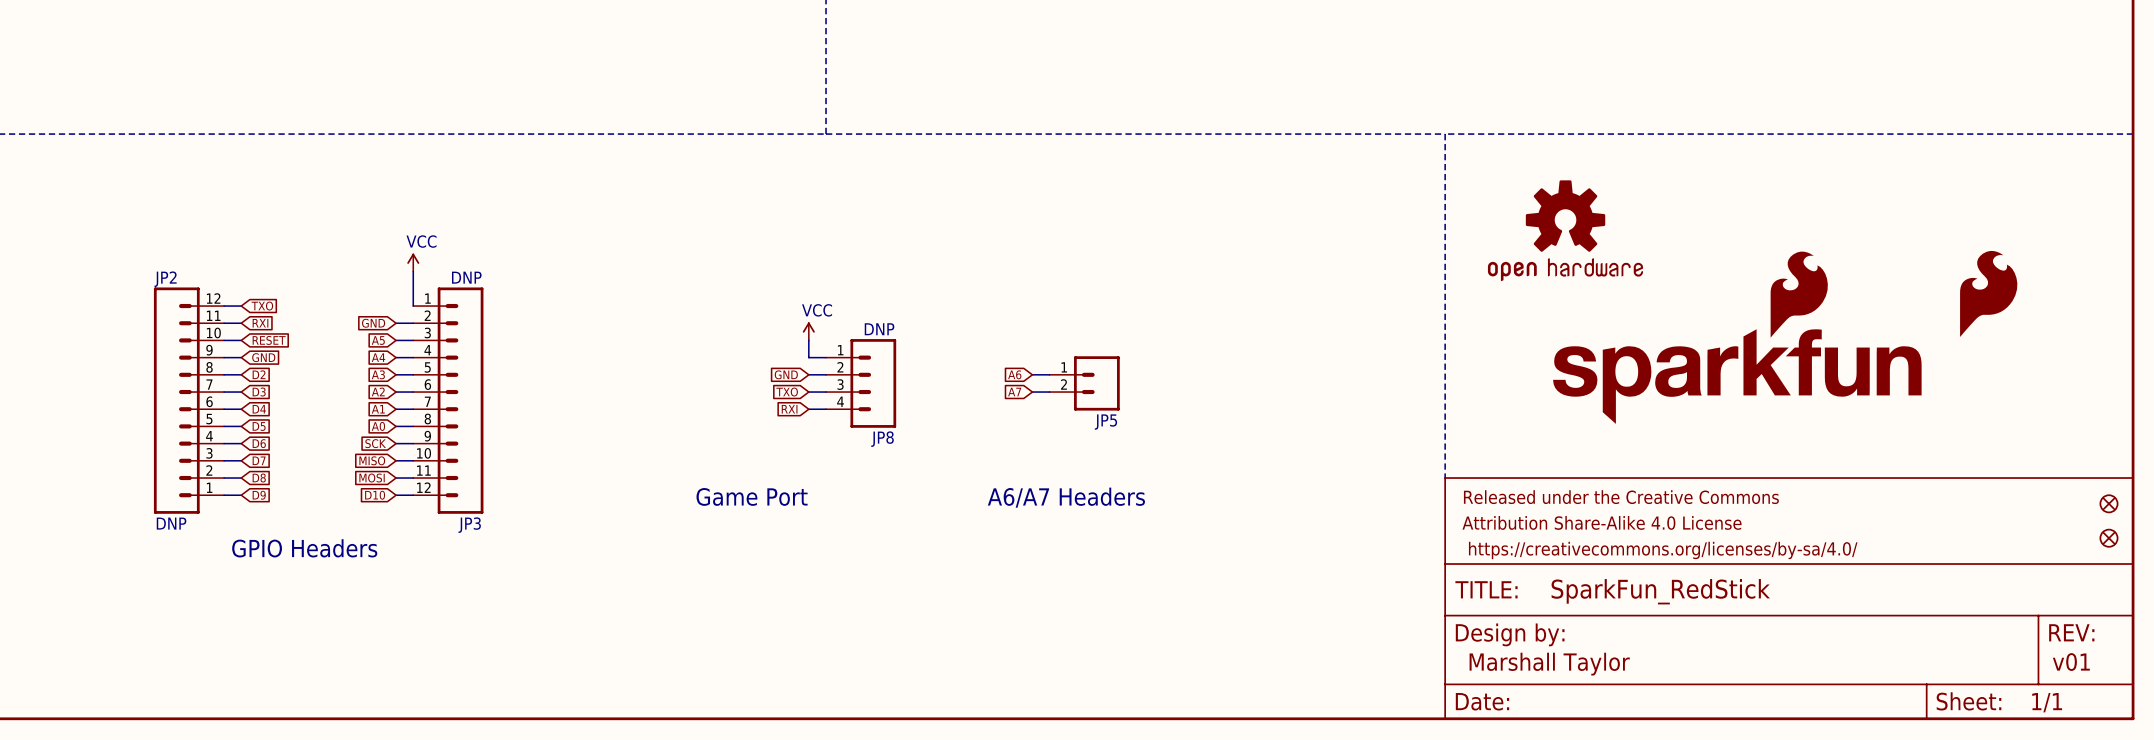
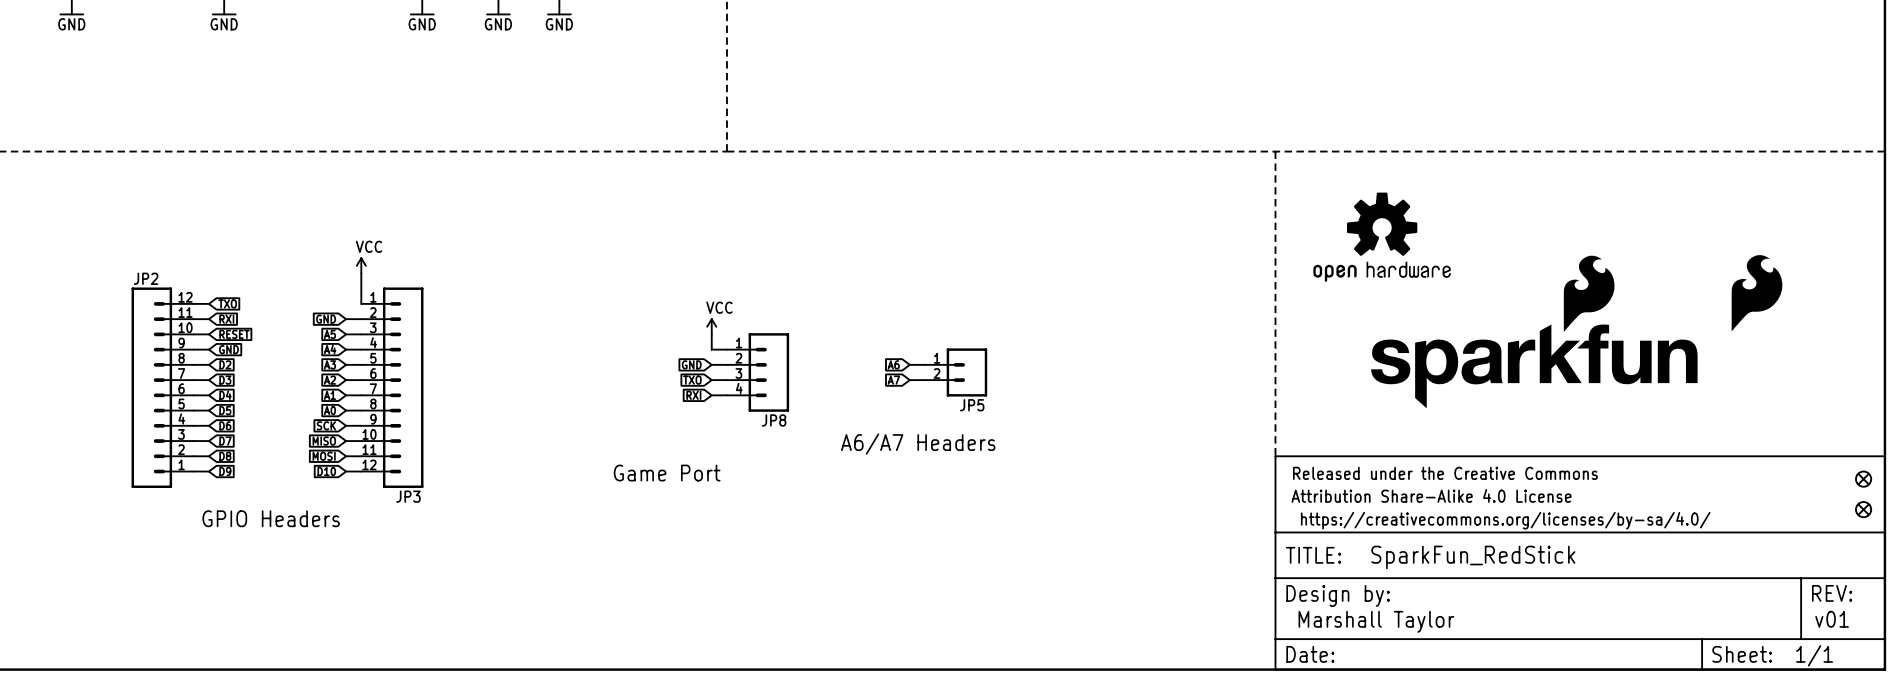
JP3 value: DNP (466, 277) -> none
JP8 value: DNP (879, 329) -> none
text position: A6/A7 Headers (1066, 497) -> A6/A7 Headers (918, 444)
JP2 value: DNP (171, 523) -> none

